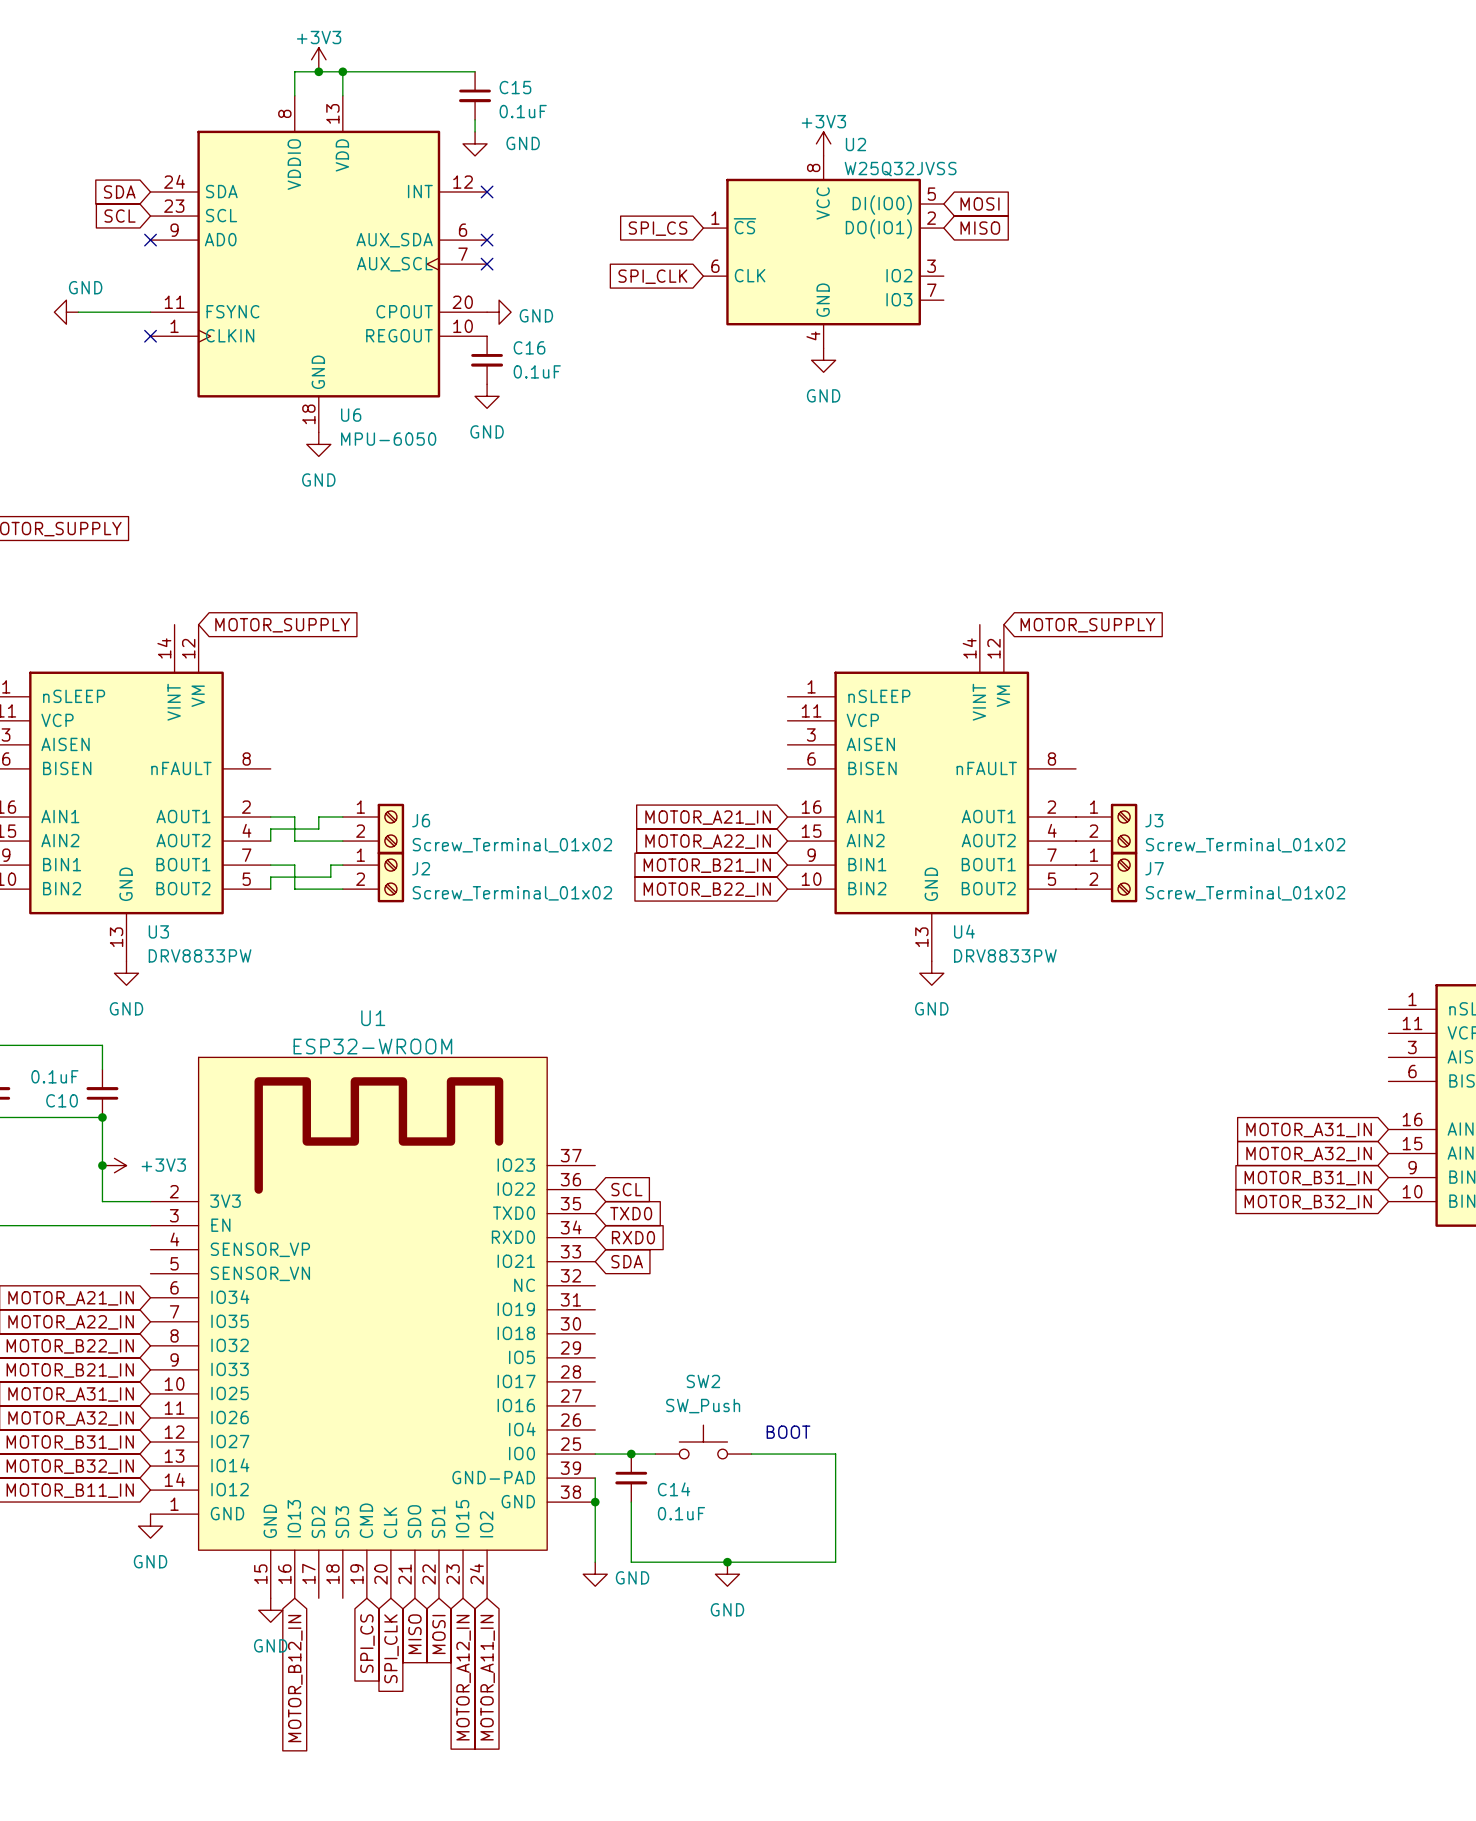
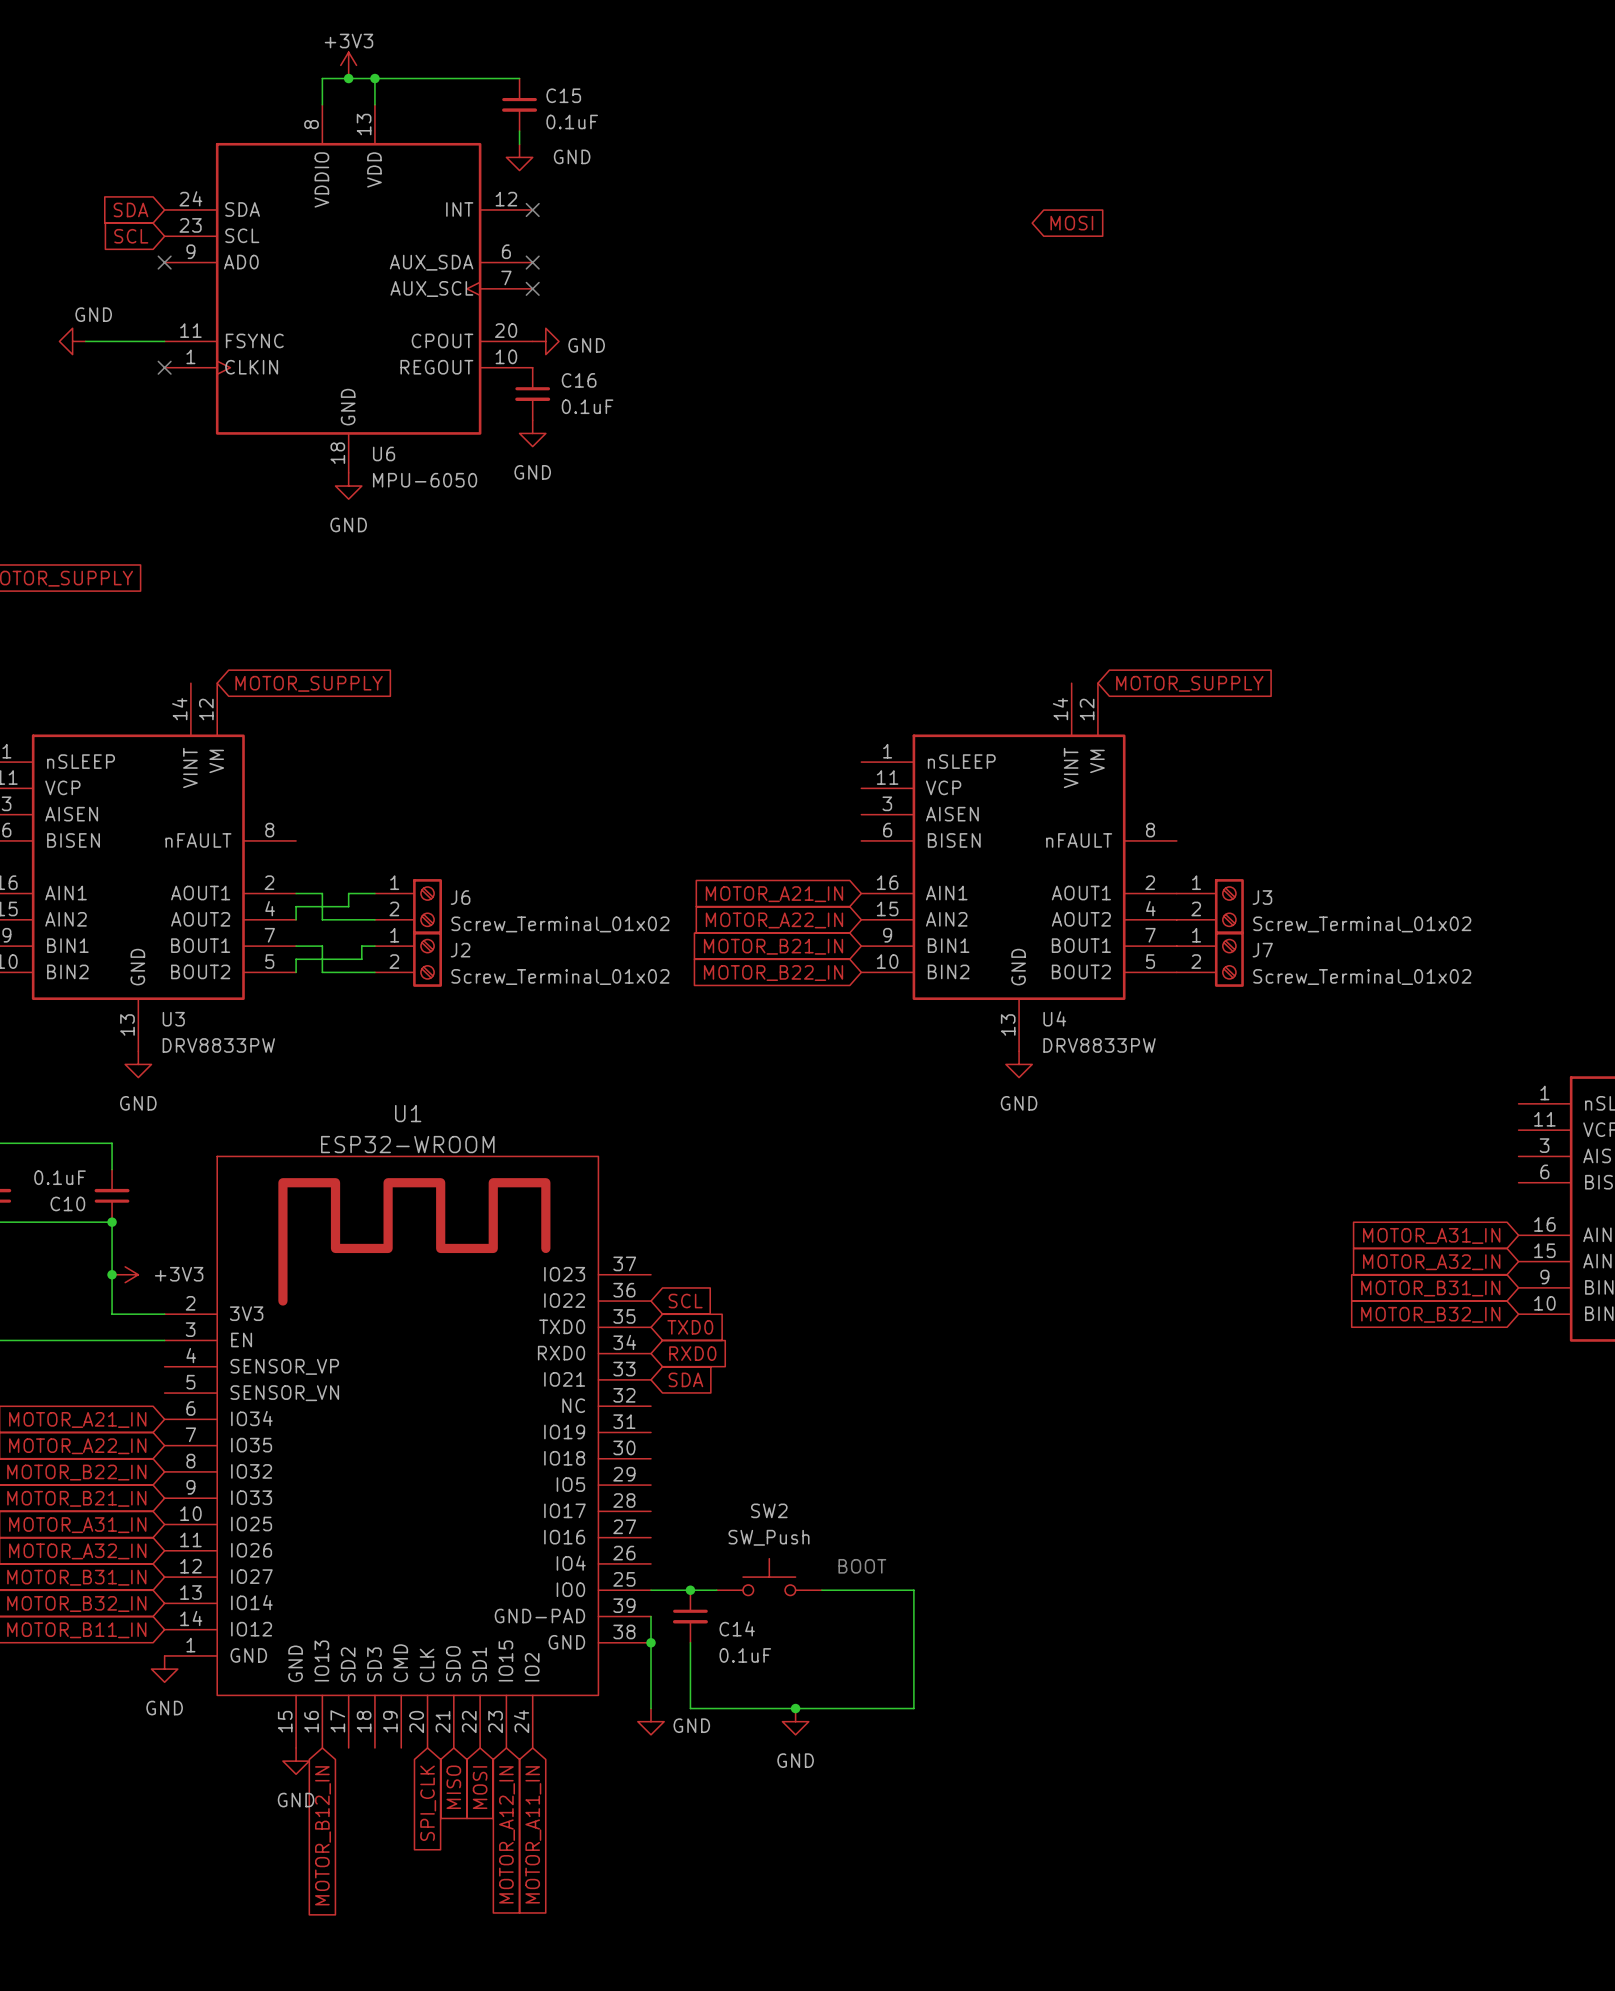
power symbol: +3V3 (823, 143) -> none
global label: SPI_CS (658, 228) -> none
global label: MISO (980, 228) -> none
U2: W25Q32JVSS (823, 252) -> none
global label: SPI_CLK (652, 276) -> none
power symbol: GND (823, 360) -> none
global label: SPI_CS (367, 1643) -> none

